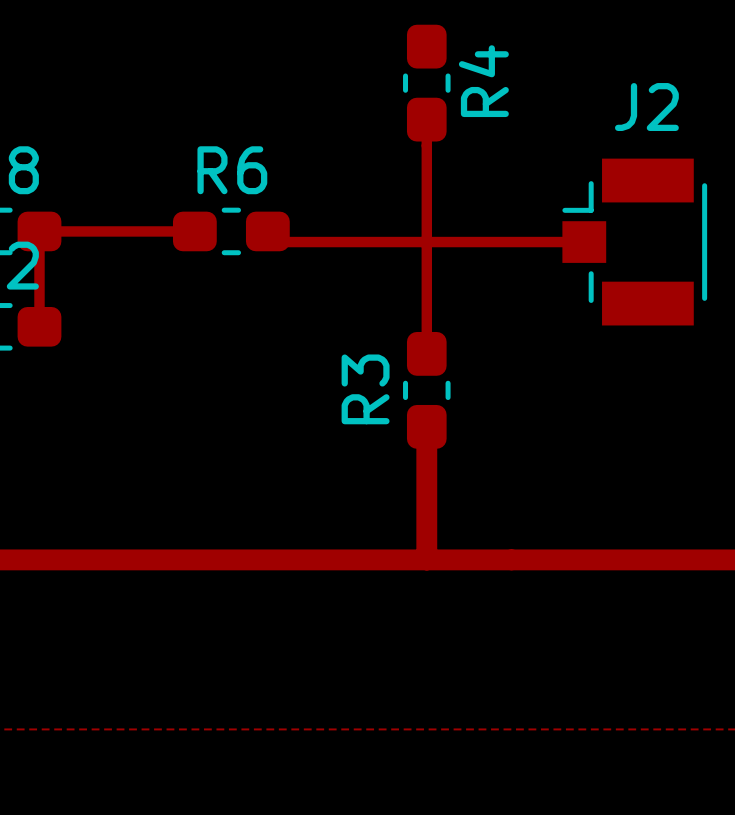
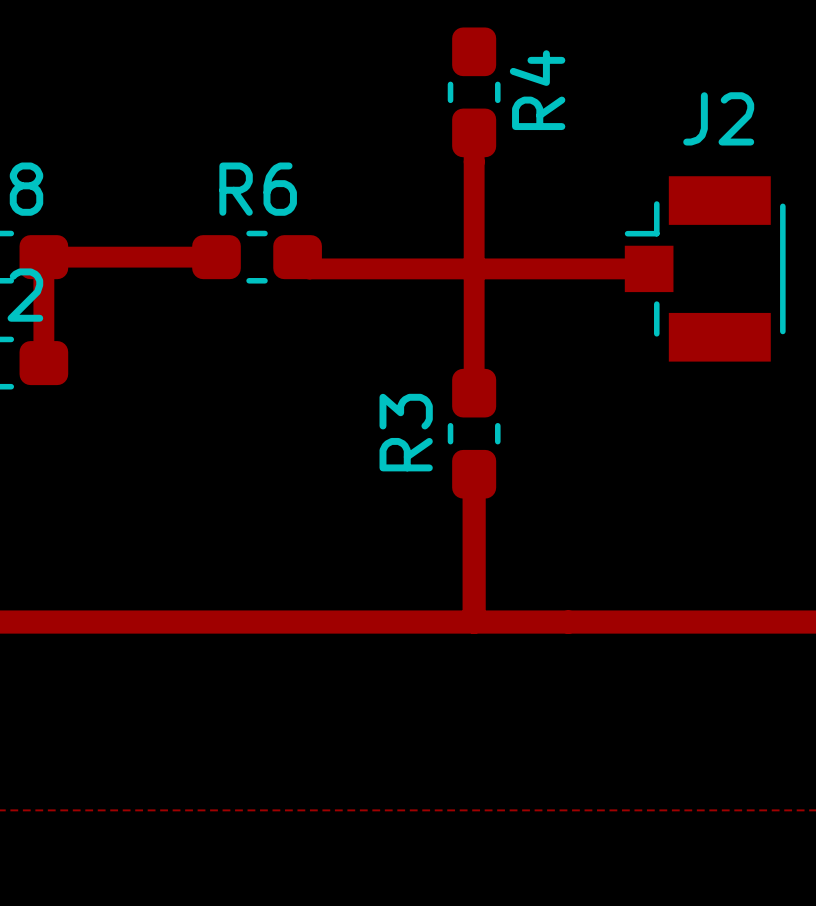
top track width: thin (426, 119) (426, 353) -> thick (474, 132) (474, 393)
top track width: thin (194, 231) (39, 231) (39, 326) -> thick (216, 257) (43, 257) (43, 363)
top track width: thin (267, 231) (278, 242) (584, 242) -> thick (297, 257) (309, 268) (649, 268)

